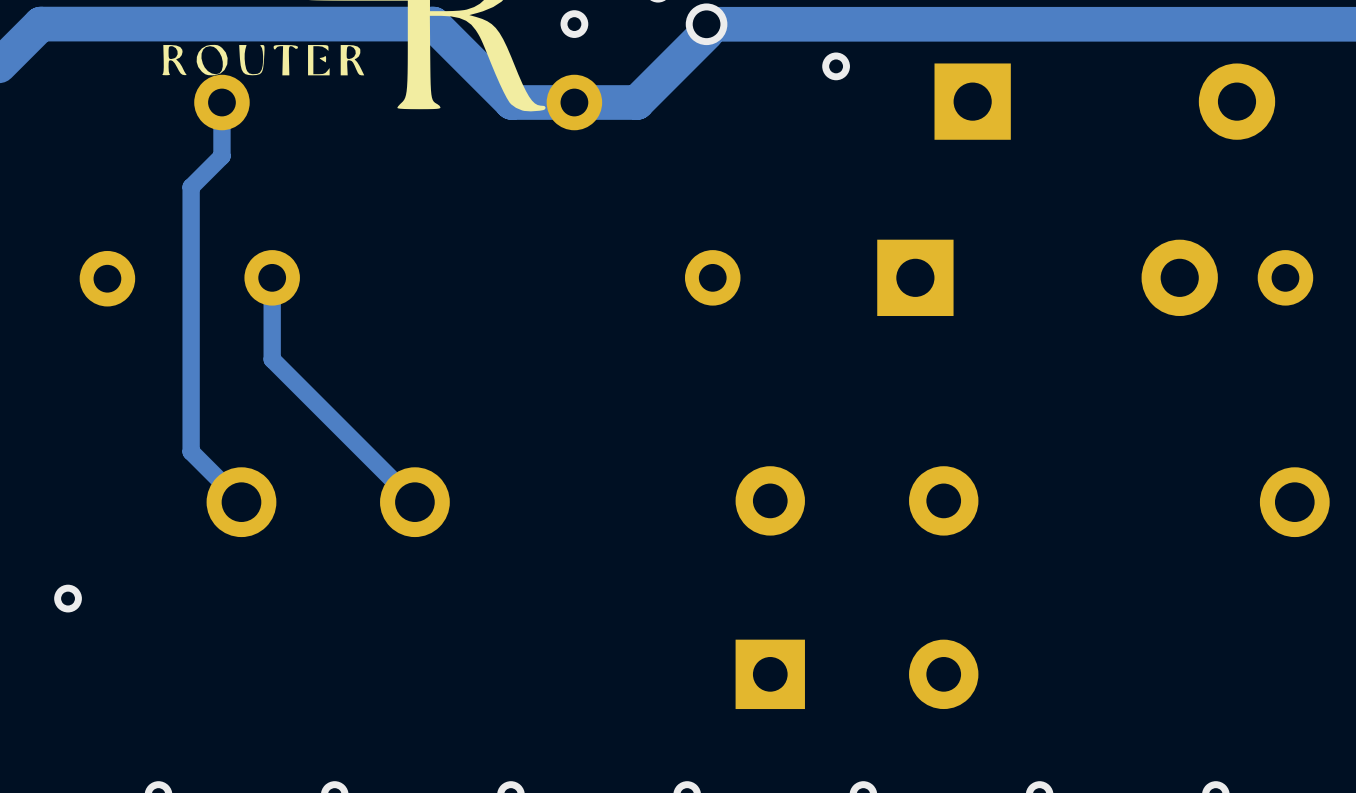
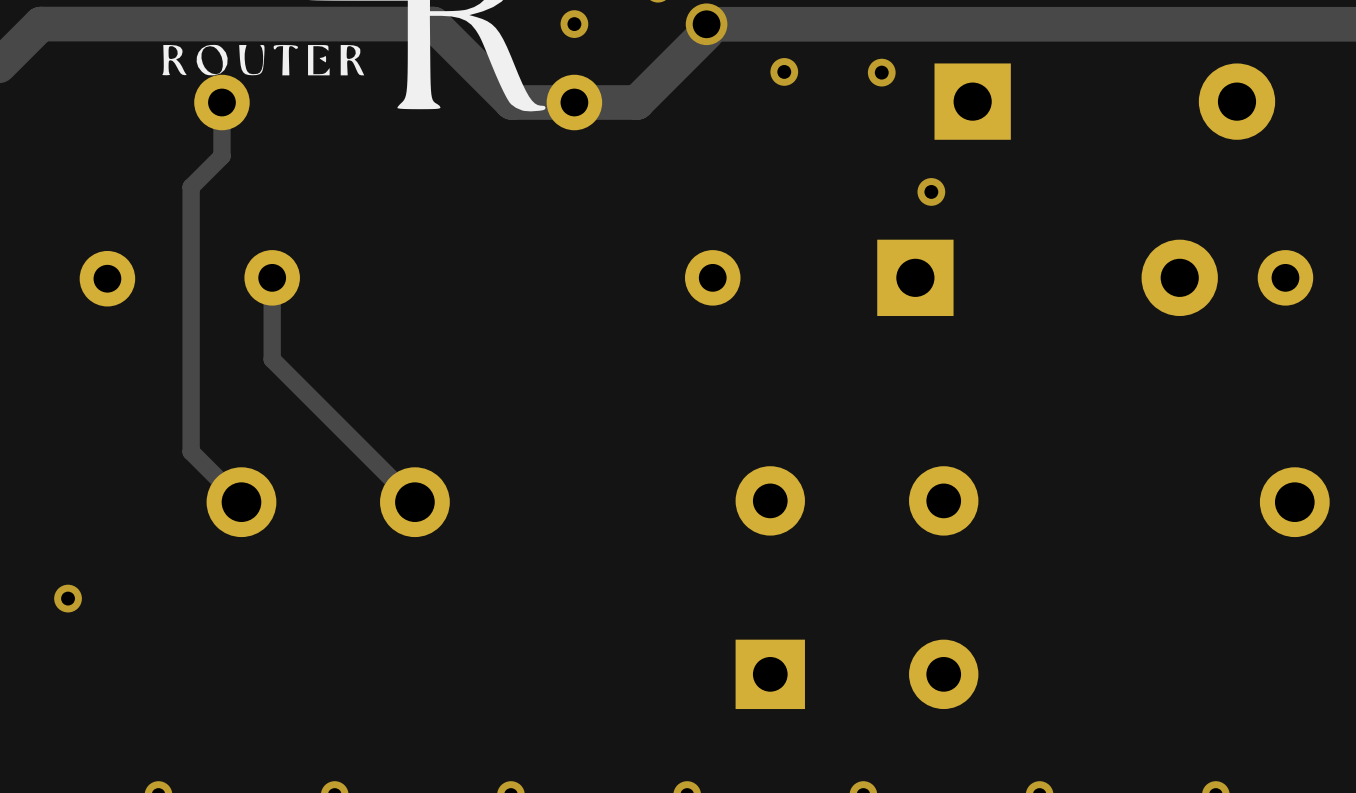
via: (836, 66) -> none
via: none -> (784, 71)
via: none -> (881, 72)
via: none -> (931, 191)

